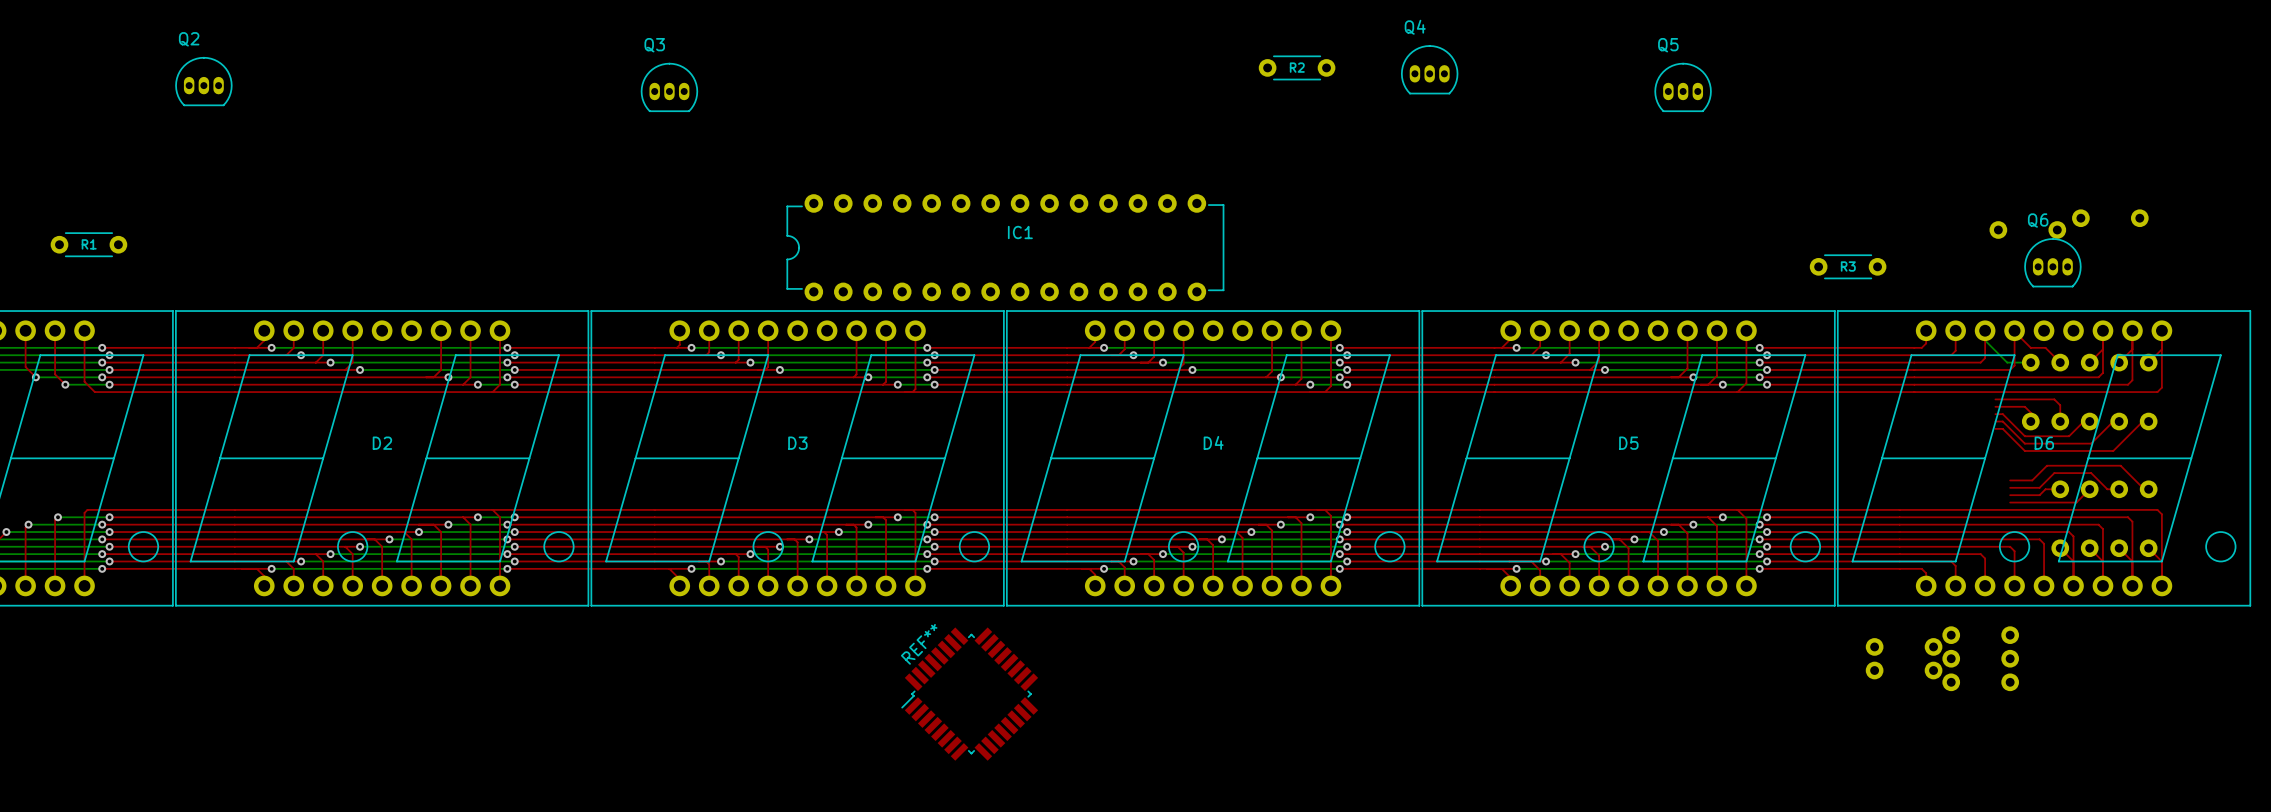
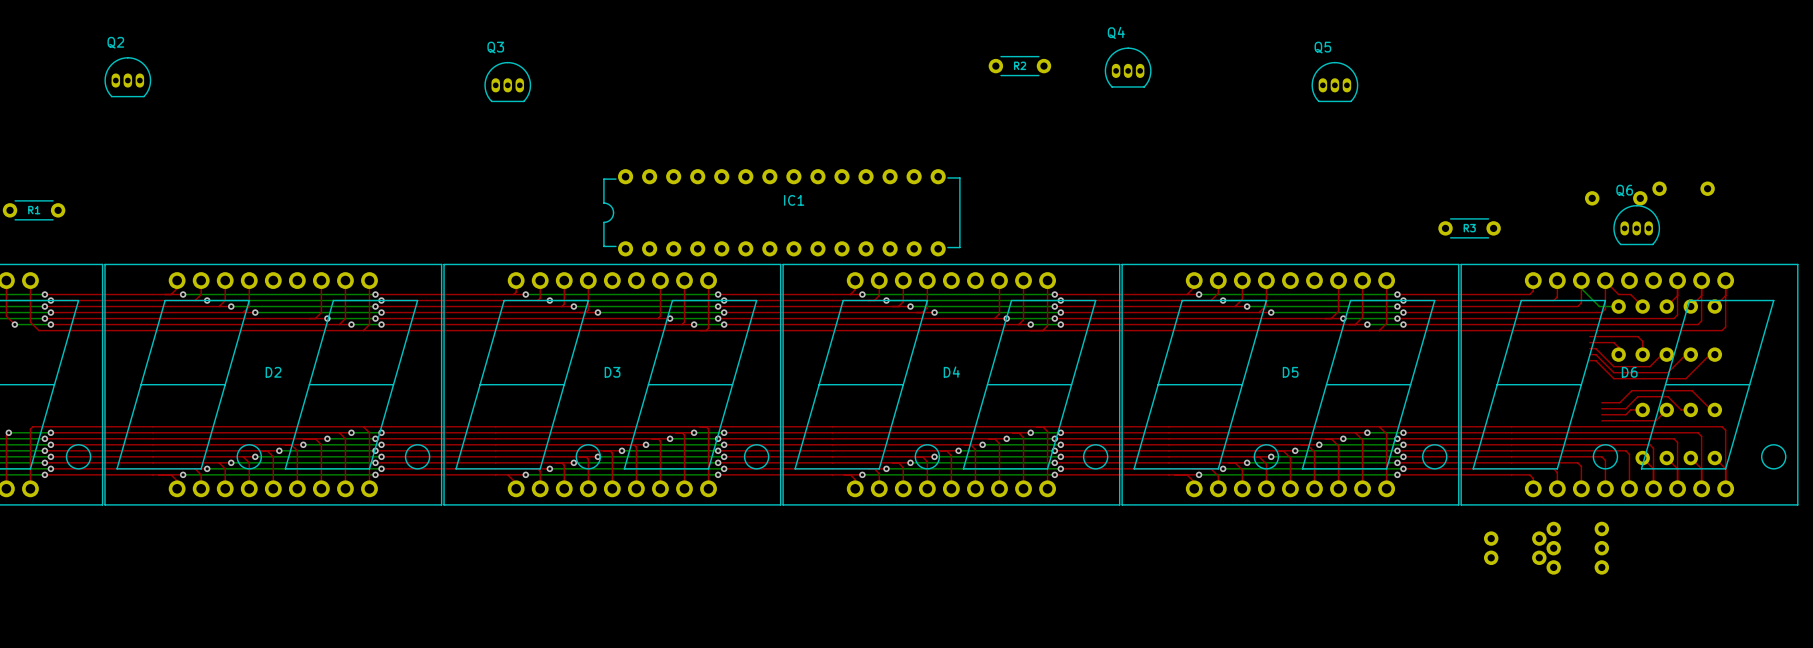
REF**: (969, 694) -> none

